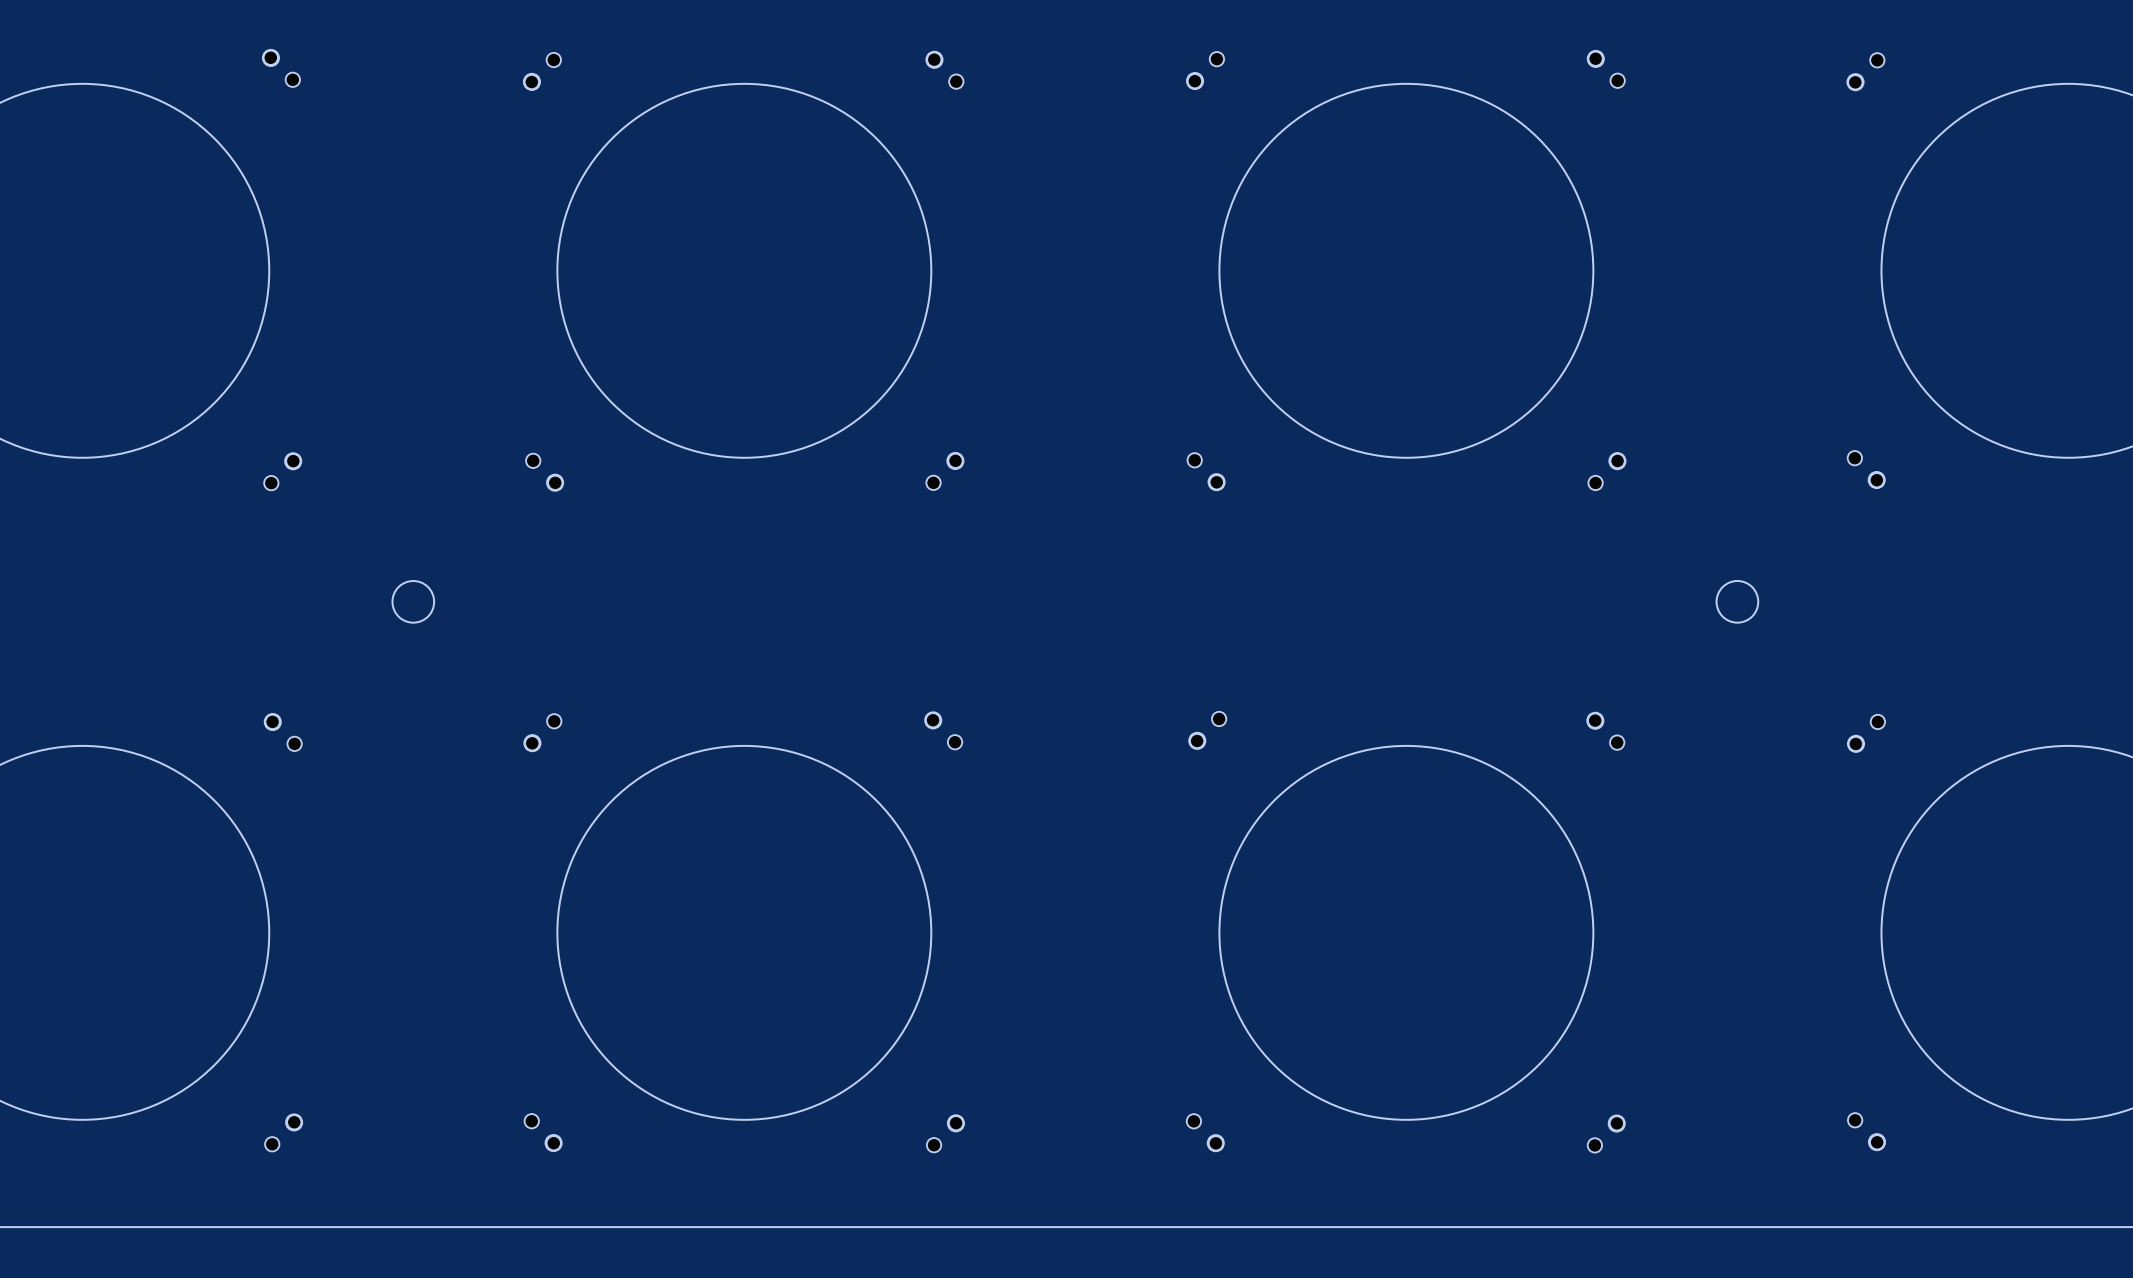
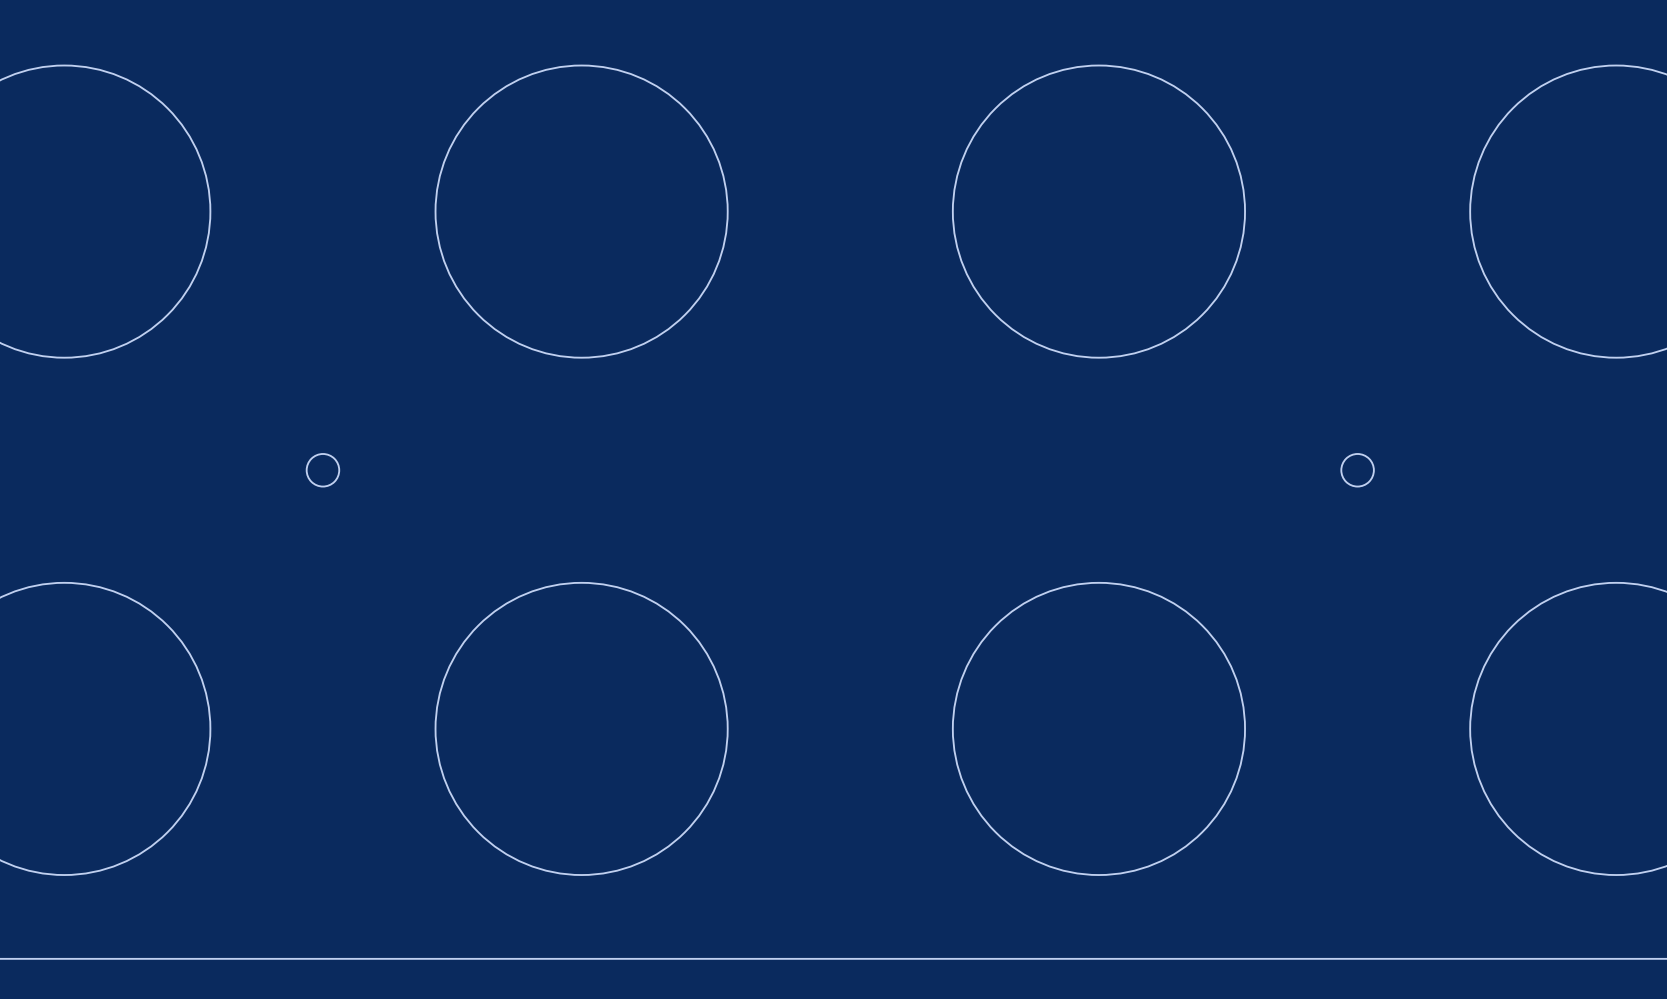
part: (281, 68) -> none
part: (1606, 69) -> none
part: (944, 70) -> none
part: (1205, 70) -> none
part: (542, 71) -> none
part: (1865, 71) -> none
part: (1866, 469) -> none
part: (282, 471) -> none
part: (944, 471) -> none
part: (1206, 471) -> none
part: (1606, 471) -> none
part: (544, 472) -> none
part: (943, 730) -> none
part: (1207, 730) -> none
part: (1605, 731) -> none
part: (283, 732) -> none
part: (542, 732) -> none
part: (1866, 733) -> none
part: (1866, 1131) -> none
part: (283, 1132) -> none
part: (543, 1132) -> none
part: (1205, 1132) -> none
part: (945, 1133) -> none
part: (1606, 1134) -> none

